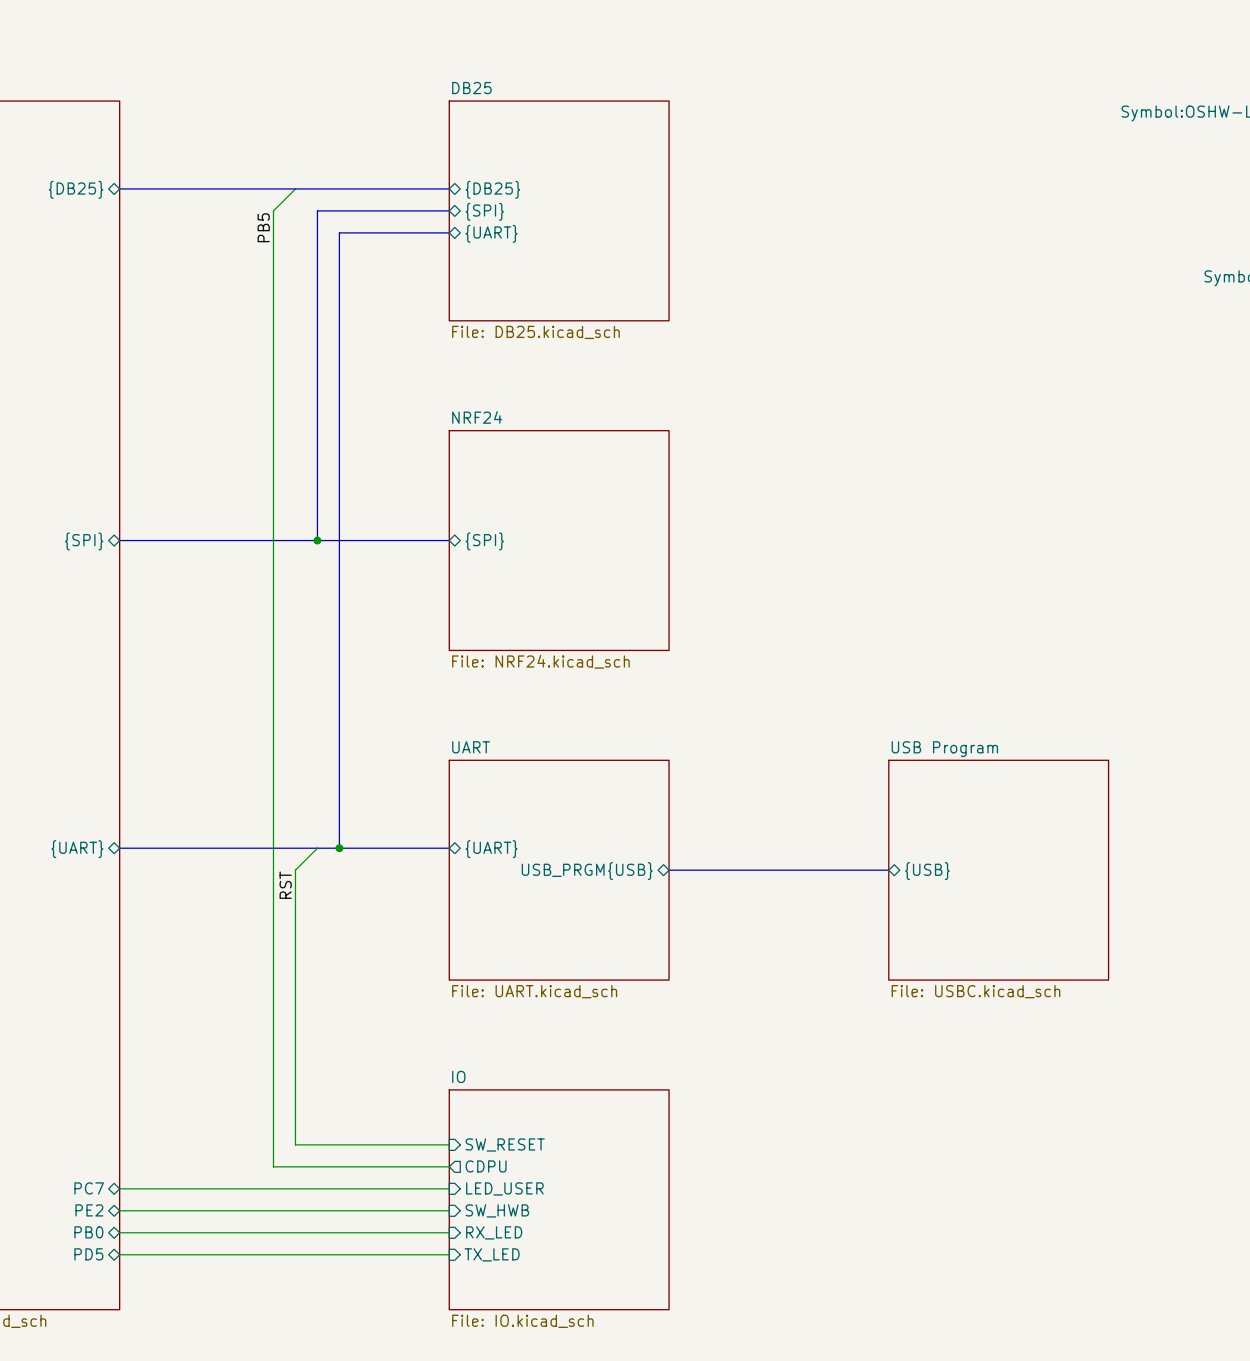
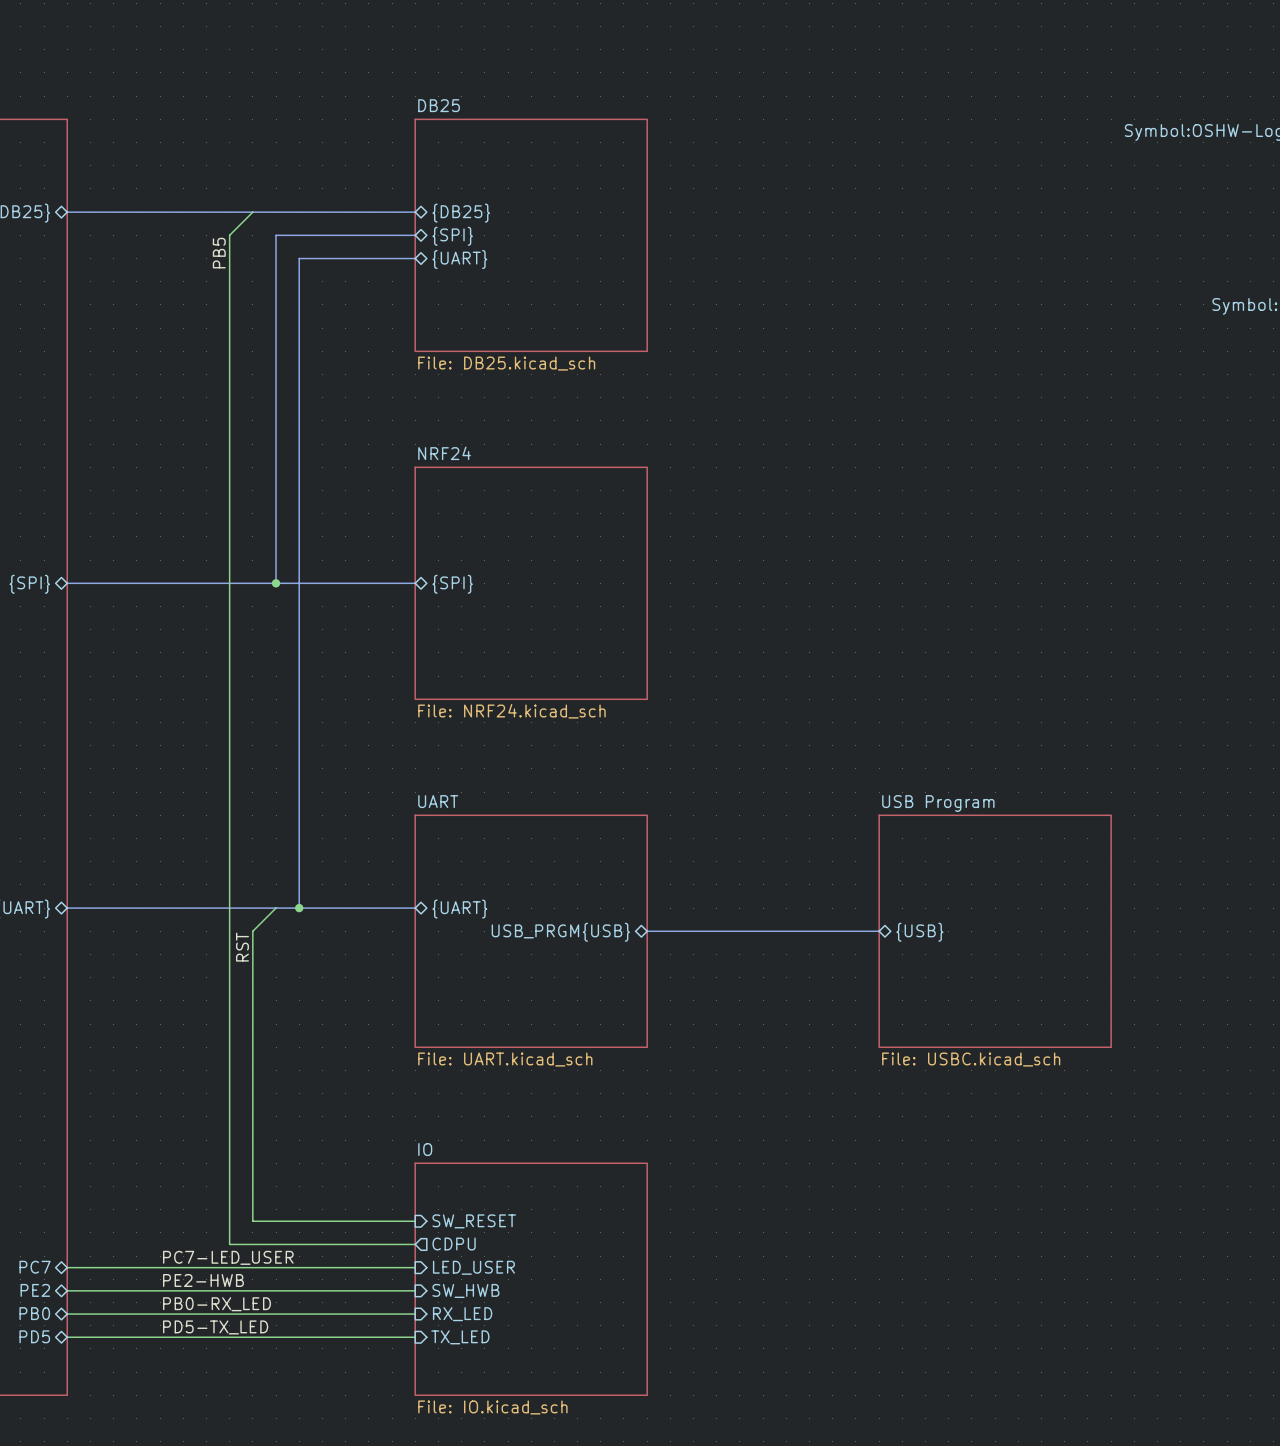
label: none -> PC7-LED_USER (228, 1257)
label: none -> PE2-HWB (203, 1280)
label: none -> PB0-RX_LED (217, 1304)
label: none -> PD5-TX_LED (215, 1327)

